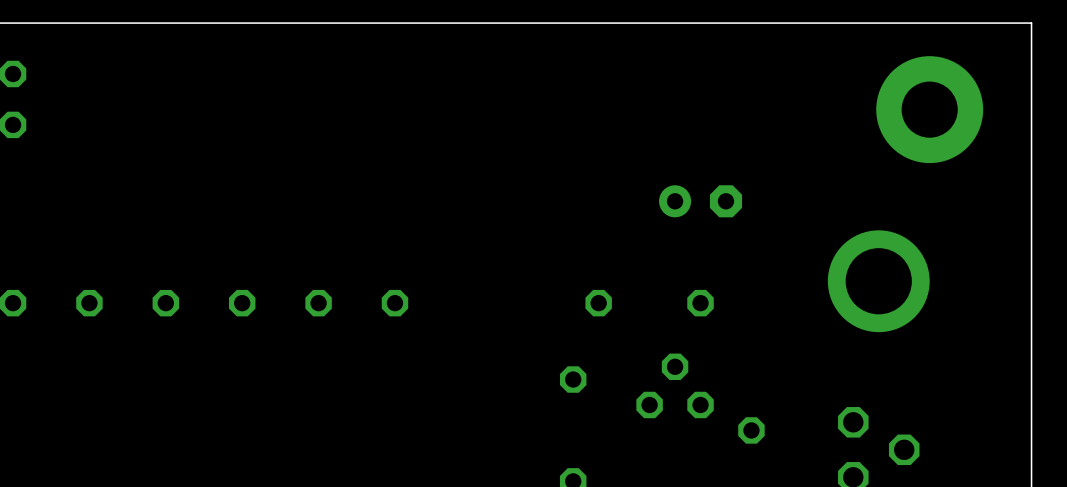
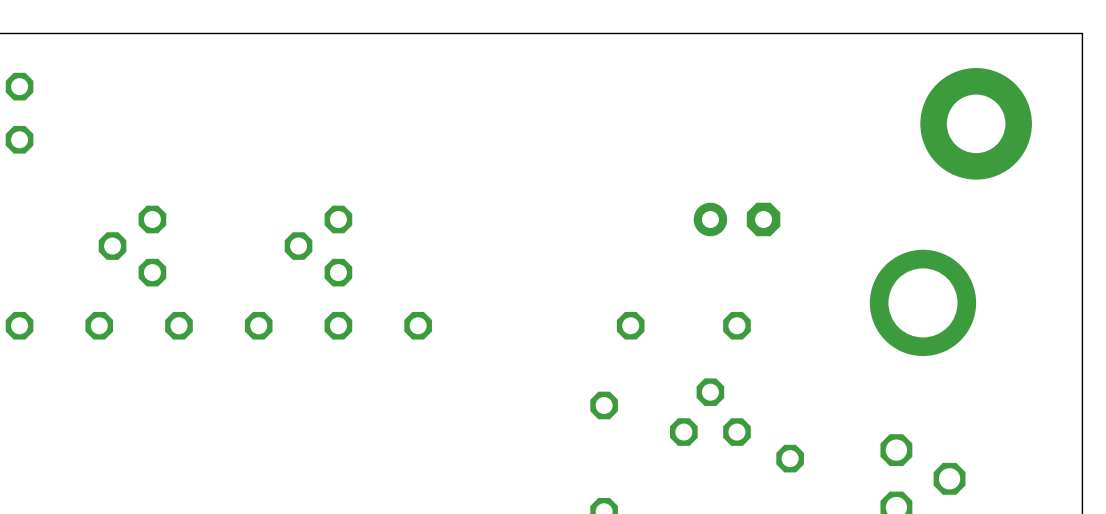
part: none -> (132, 246)
part: none -> (318, 246)

